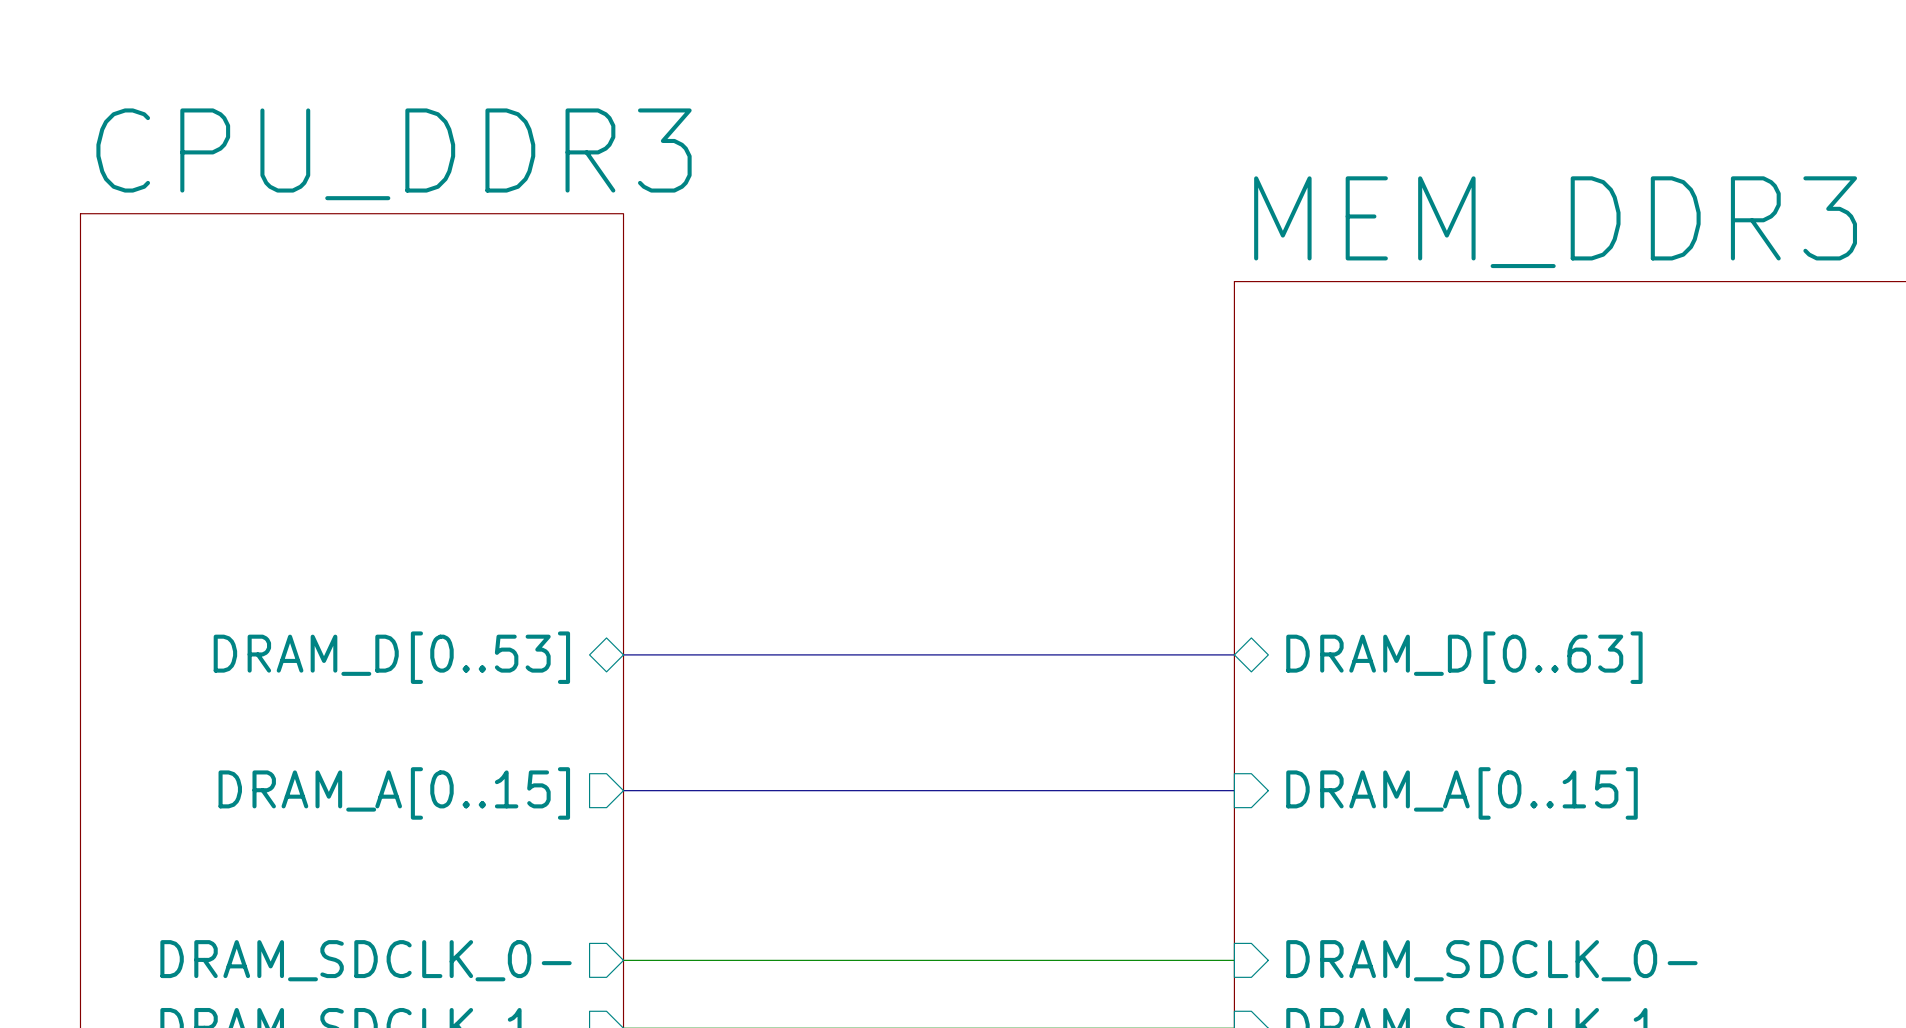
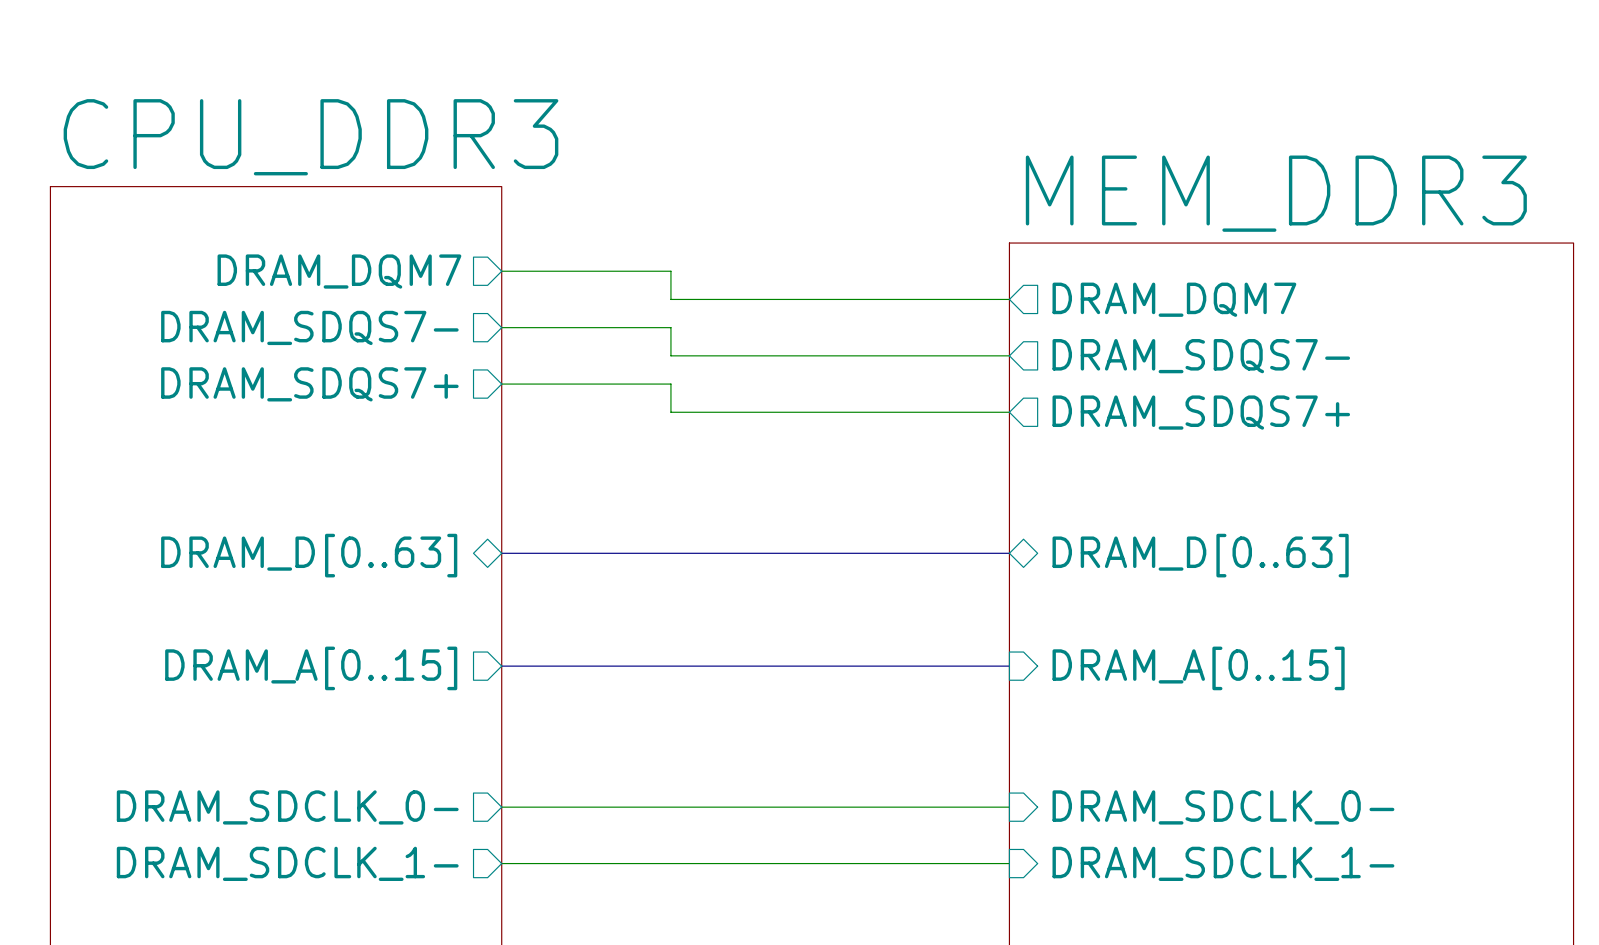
sheet pin: none -> DRAM_DQM7 (339, 271)
wire: none -> (501, 271) (670, 271) (670, 299) (1009, 299)
sheet pin: none -> DRAM_DQM7 (1174, 299)
sheet pin: none -> DRAM_SDQS7- (309, 327)
wire: none -> (501, 327) (670, 327) (670, 355) (1009, 355)
sheet pin: none -> DRAM_SDQS7- (1201, 356)
sheet pin: none -> DRAM_SDQS7+ (309, 384)
wire: none -> (501, 384) (670, 384) (670, 412) (1009, 412)
sheet pin: none -> DRAM_SDQS7+ (1201, 412)
sheet pin: DRAM_D[0..53] (391, 657) -> DRAM_D[0..63] (309, 555)

